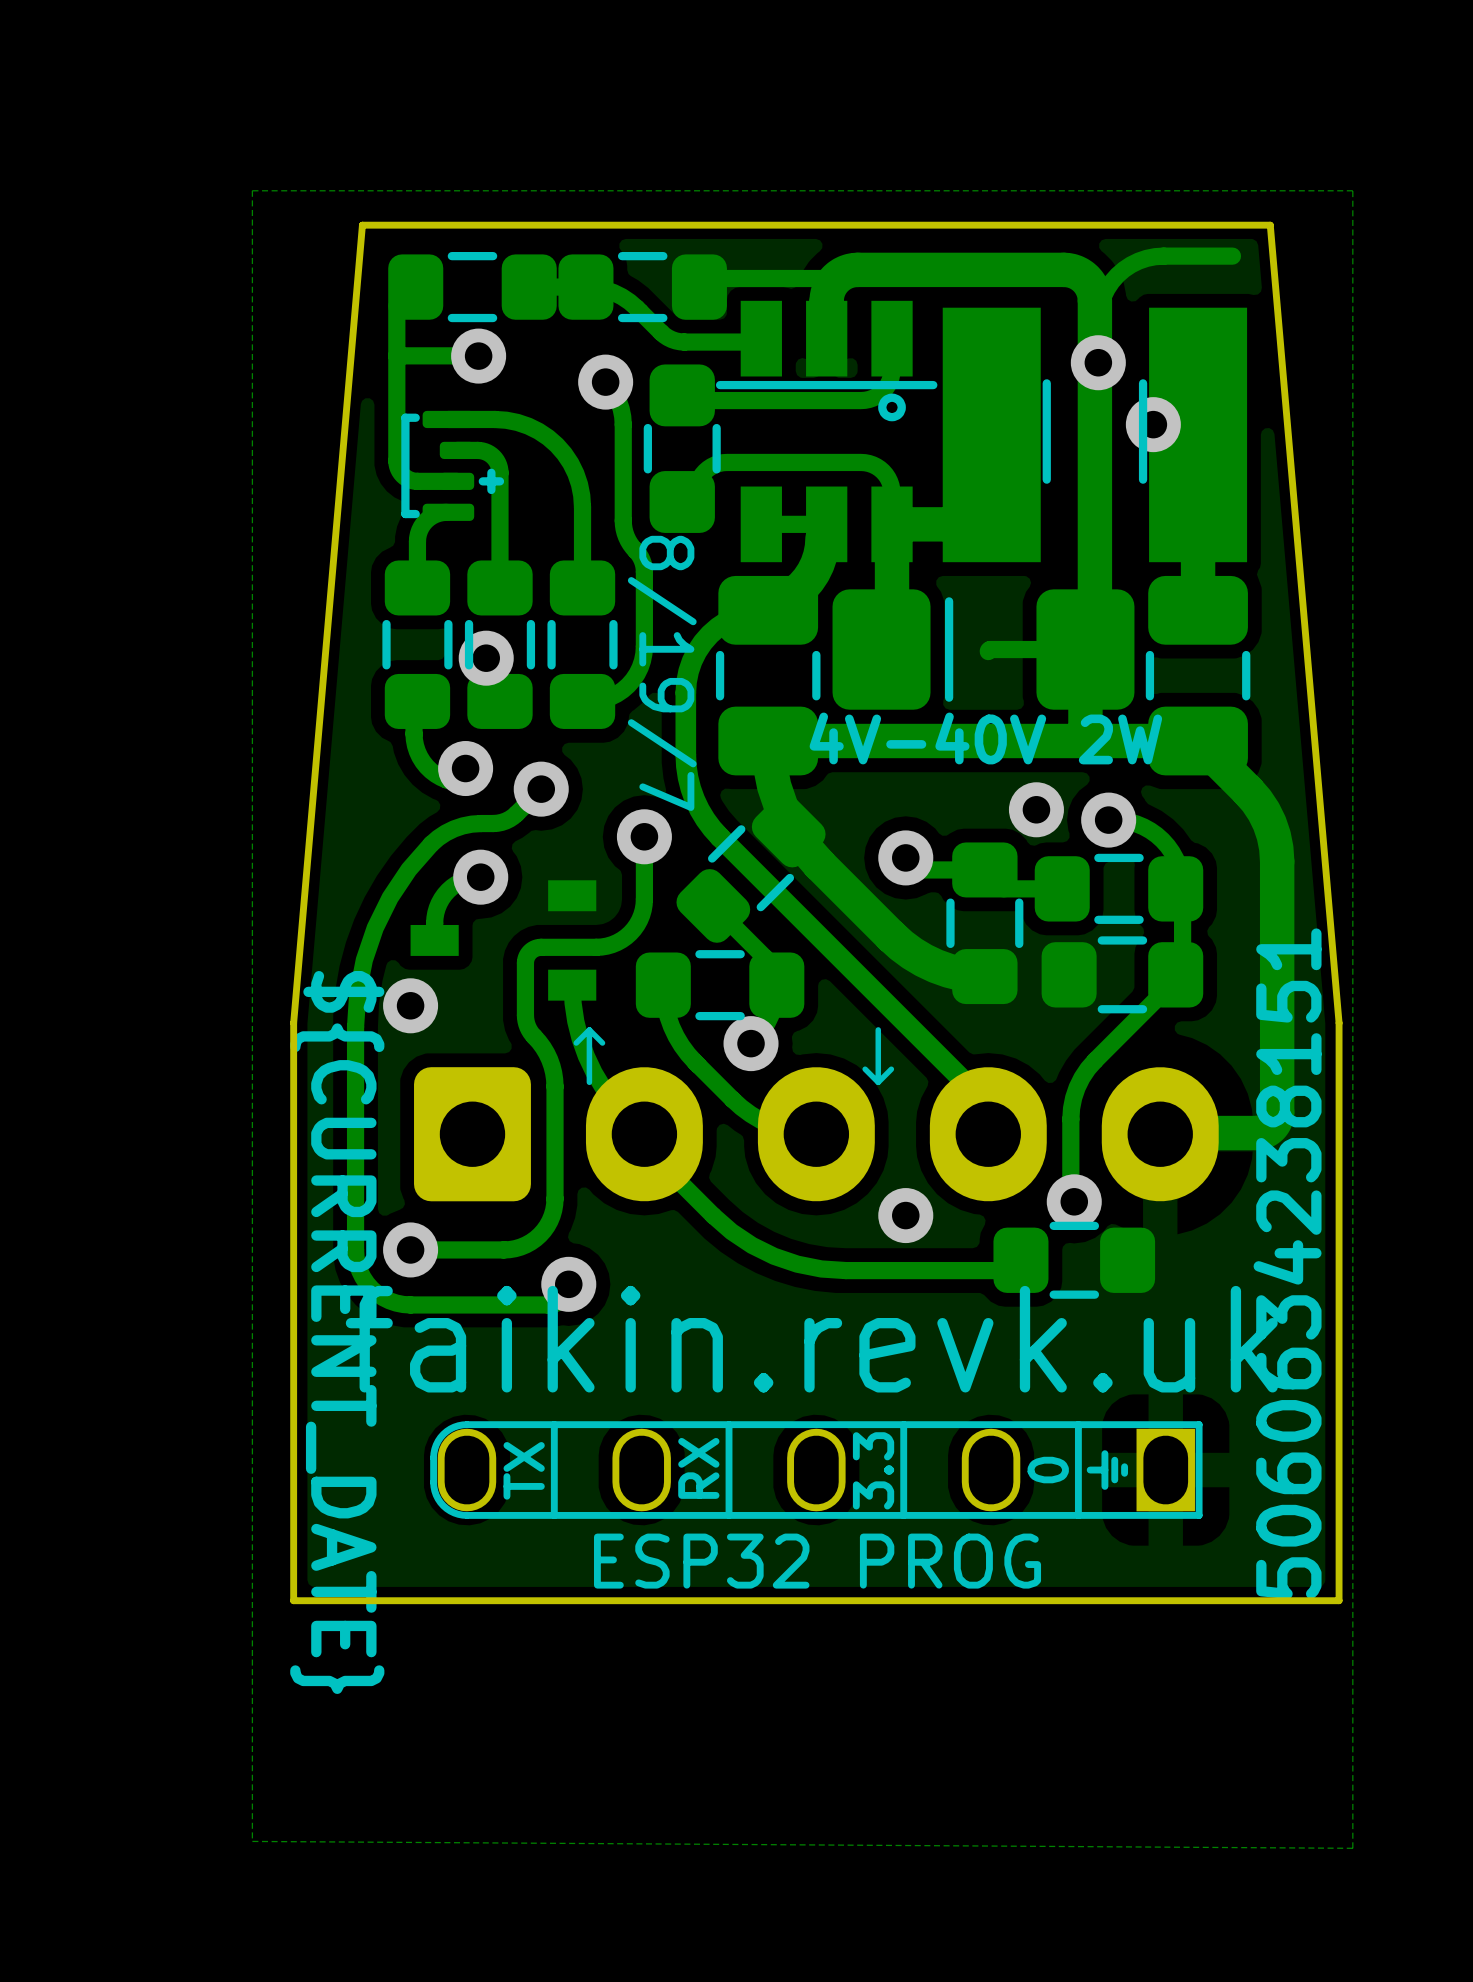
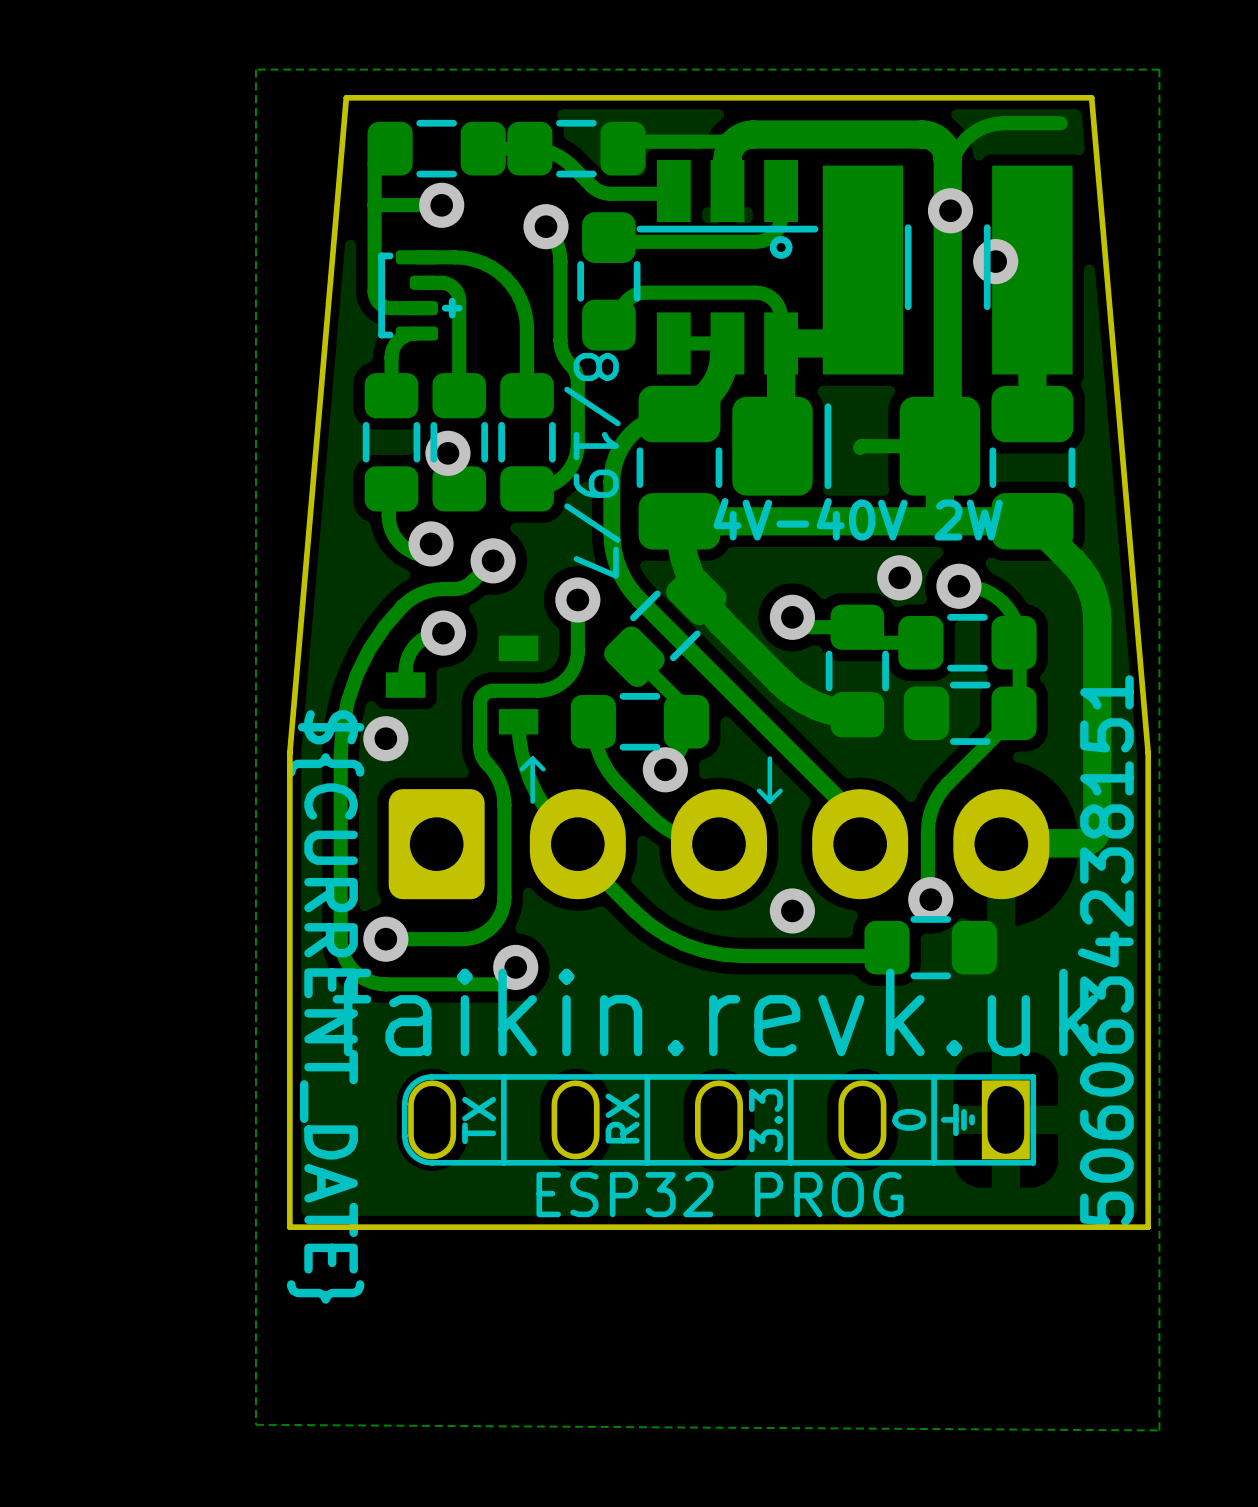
part footprint: [430, 1421, 1203, 1519] -> [401, 1074, 1037, 1166]

